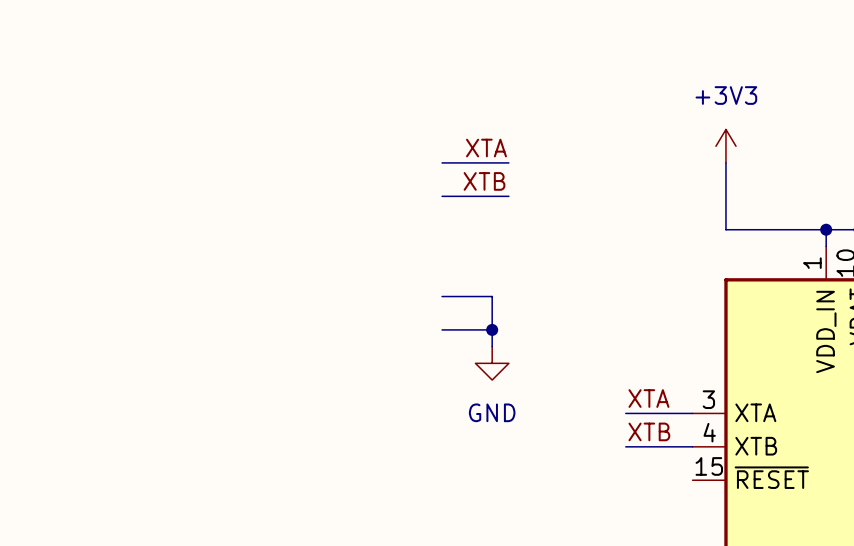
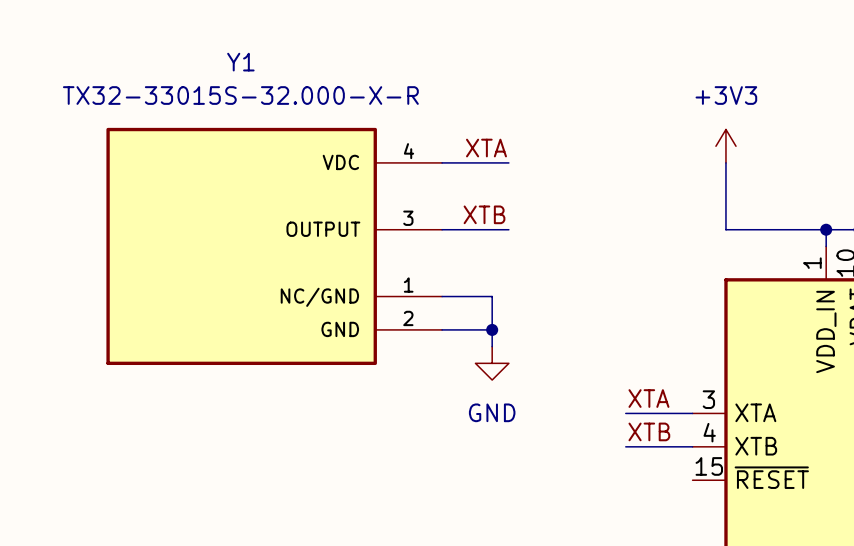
label position: XTB (484, 181) -> XTB (484, 214)
wire: (442, 196) (508, 196) -> (442, 229) (508, 229)
Y1: none -> TX32-33015S-32.000-X-R (274, 246)

